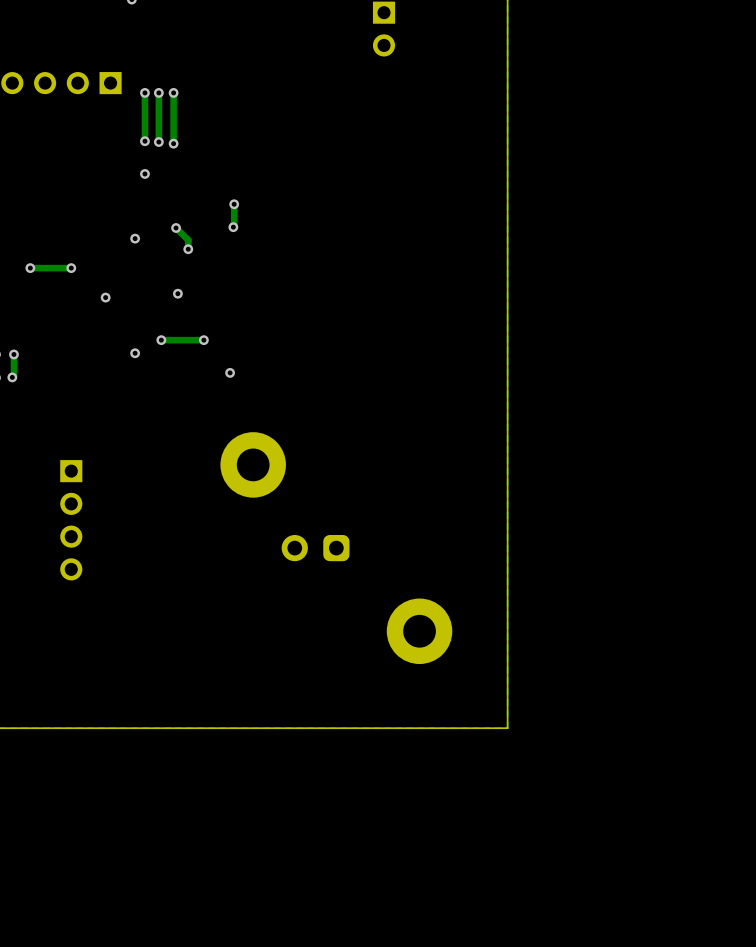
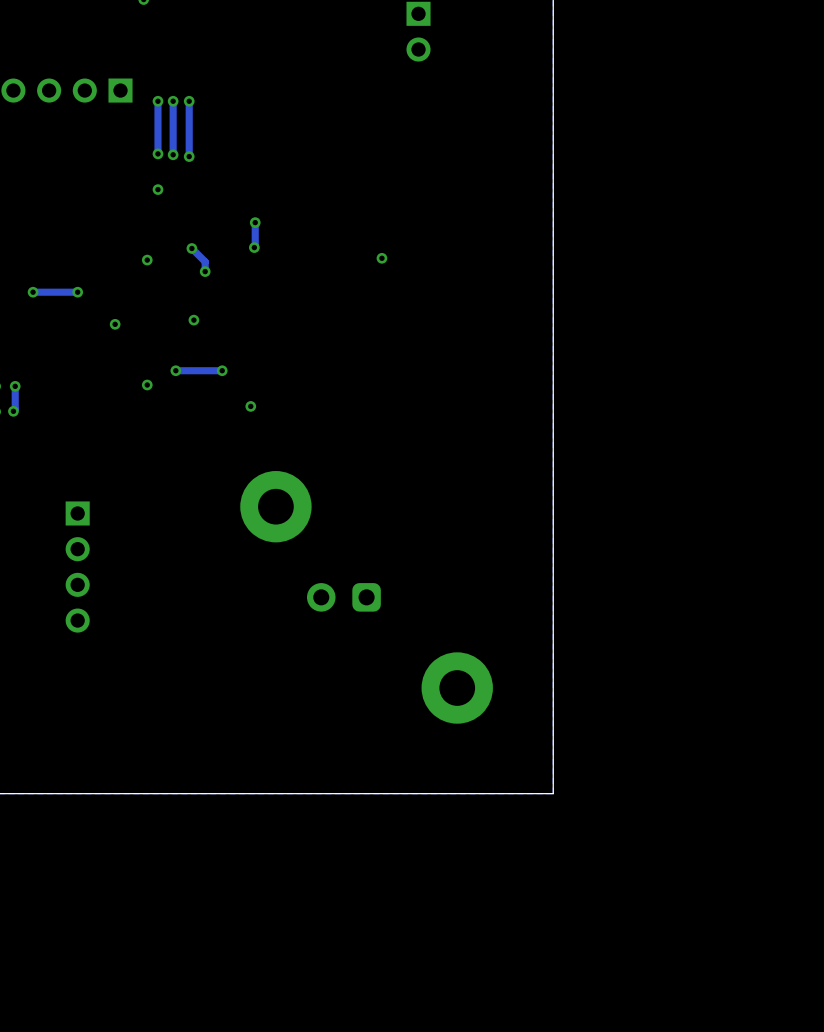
via: none -> (381, 258)

